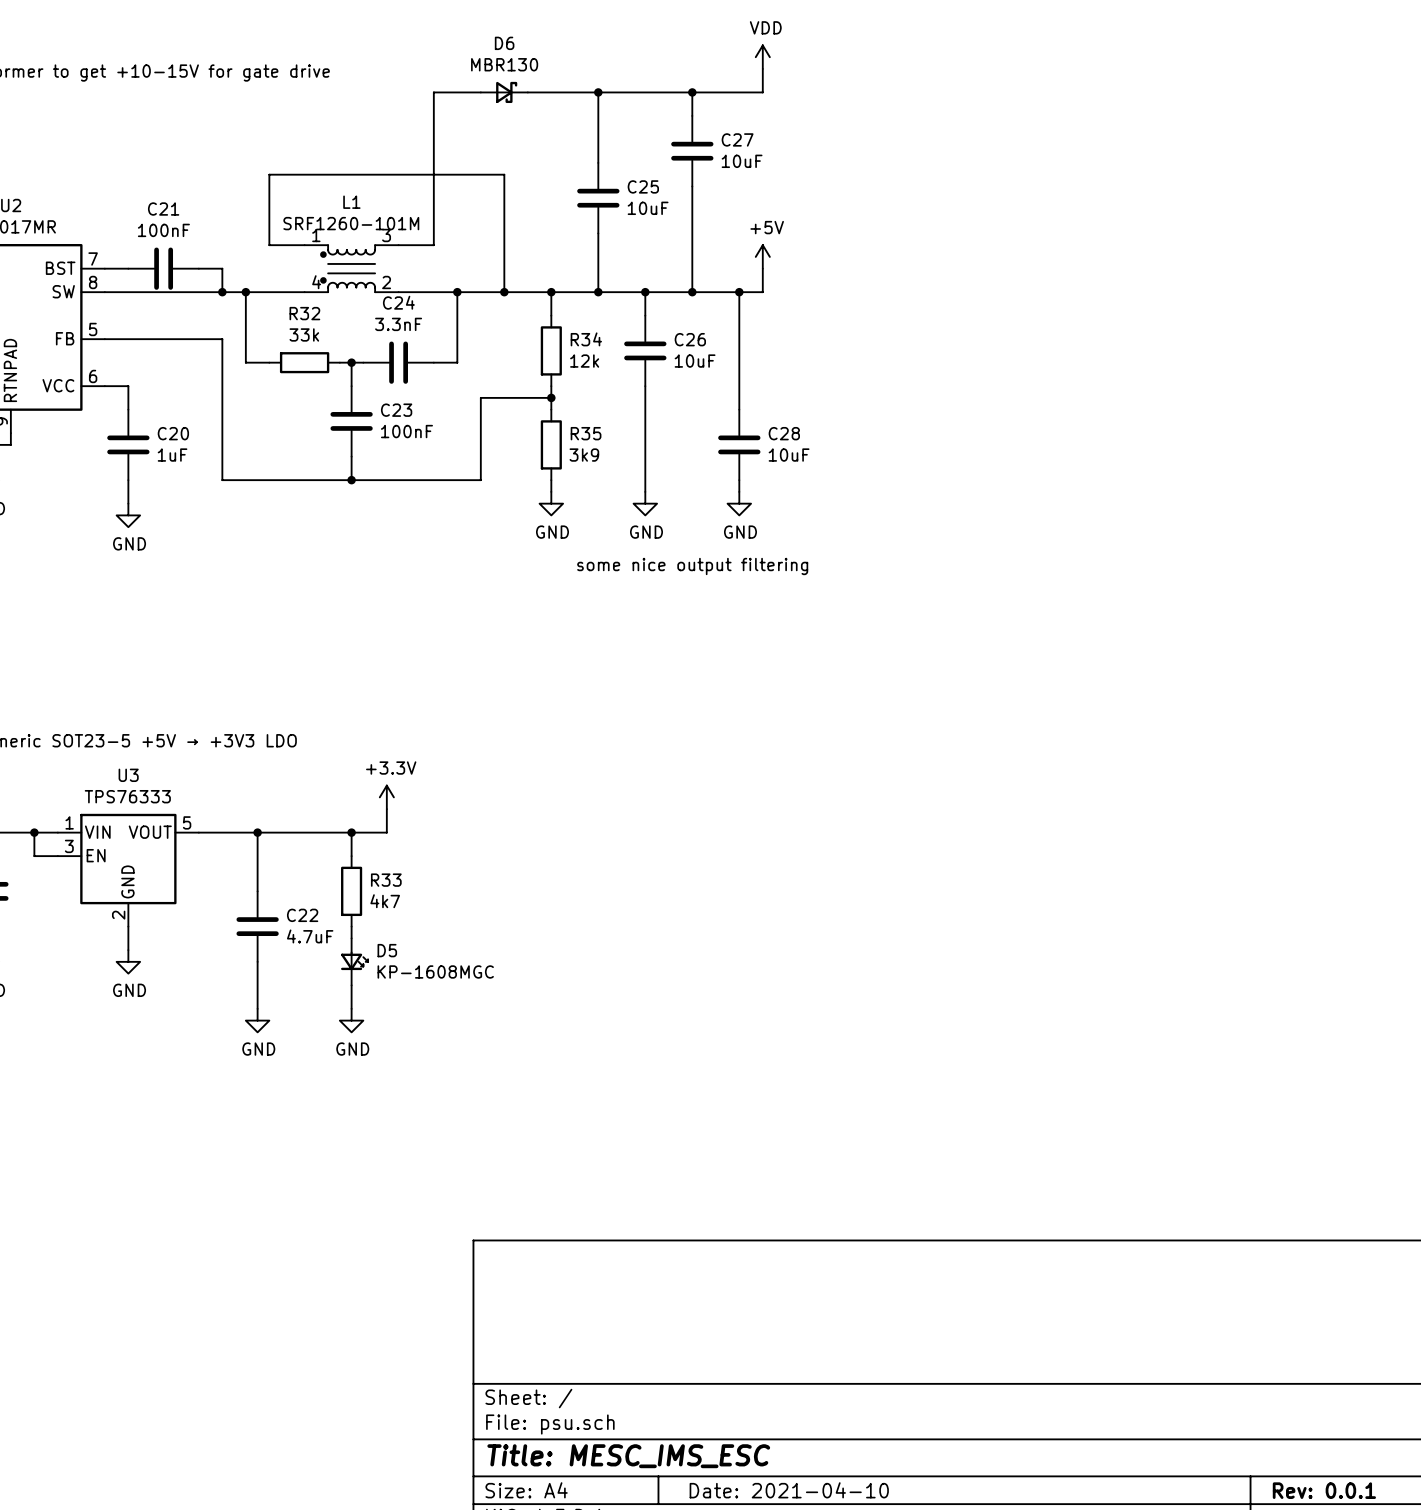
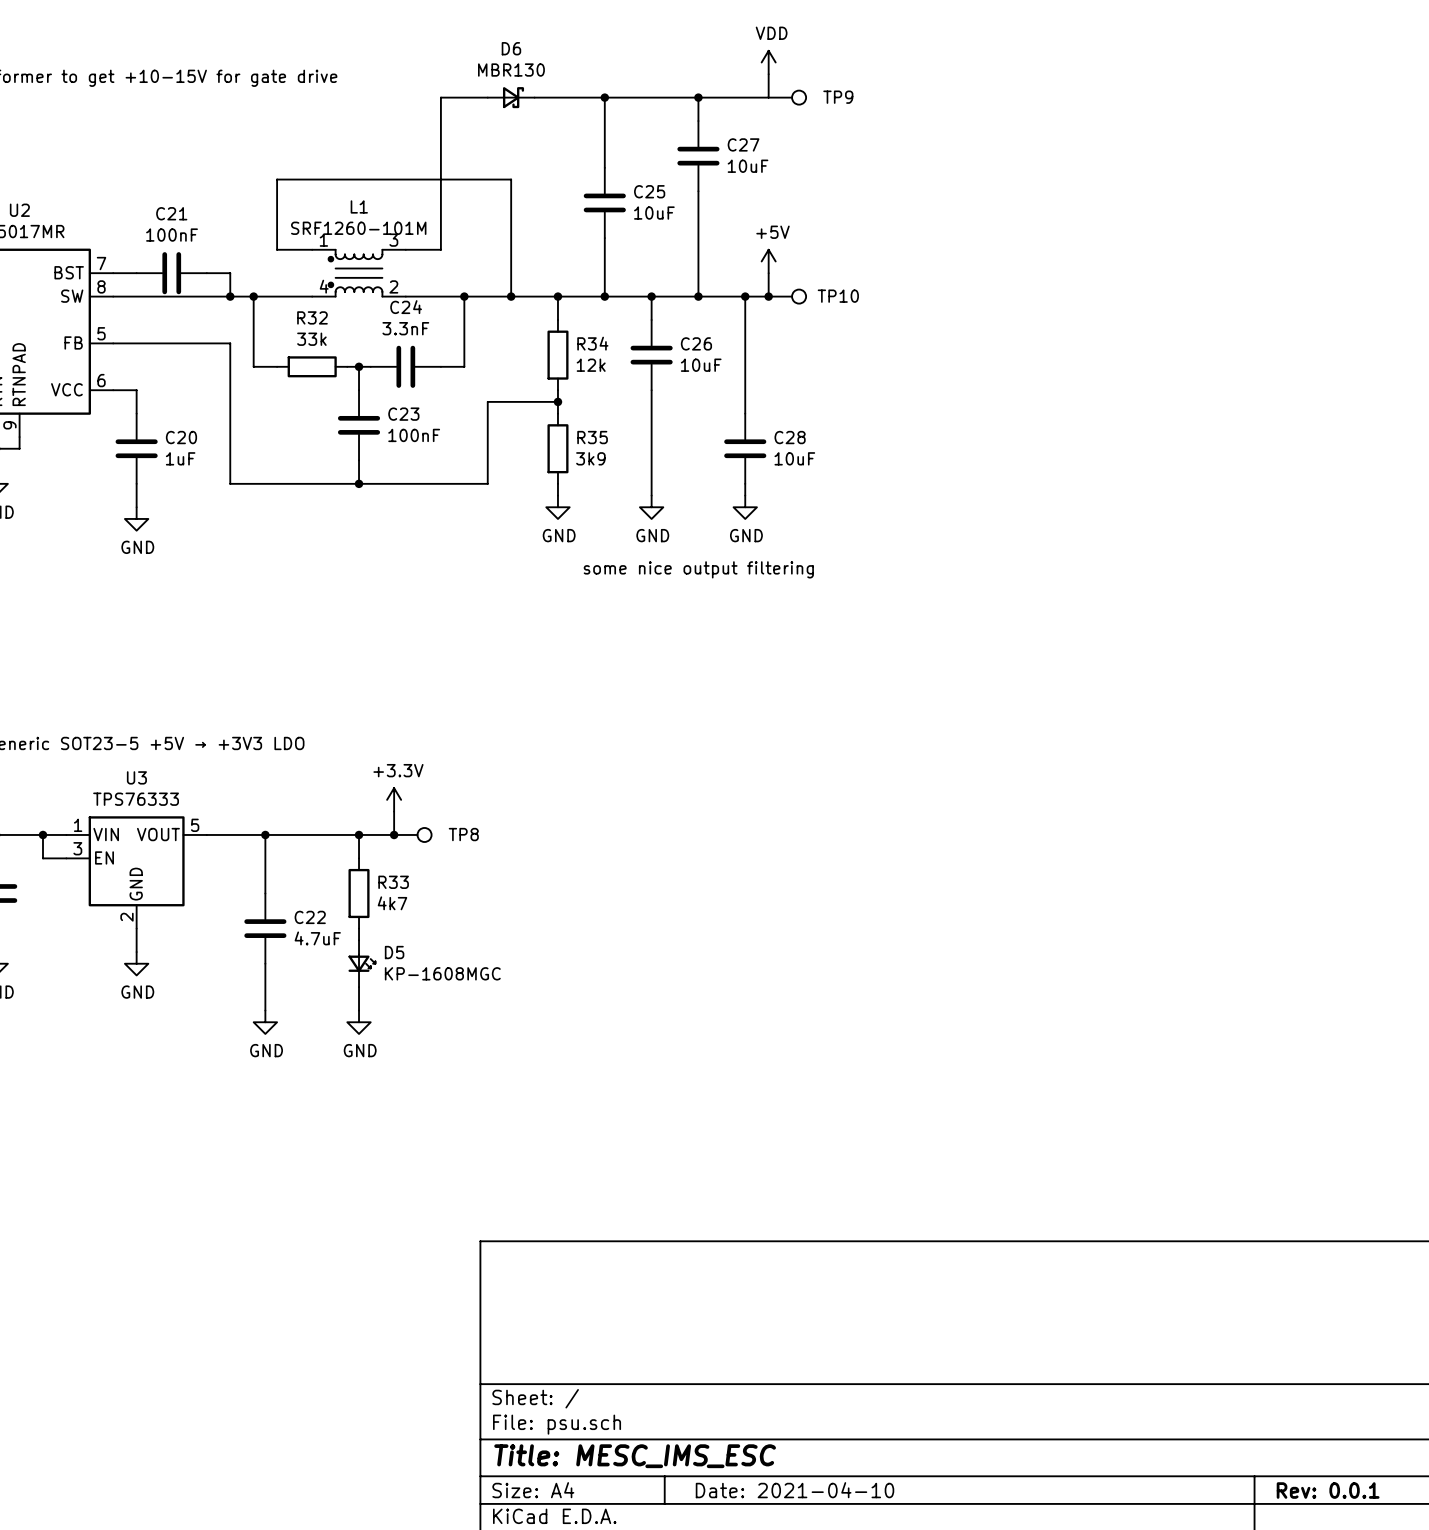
TP9: none -> (787, 97)
junction: none -> (768, 296)
TP10: none -> (787, 296)
junction: none -> (394, 834)
TP8: none -> (412, 834)

